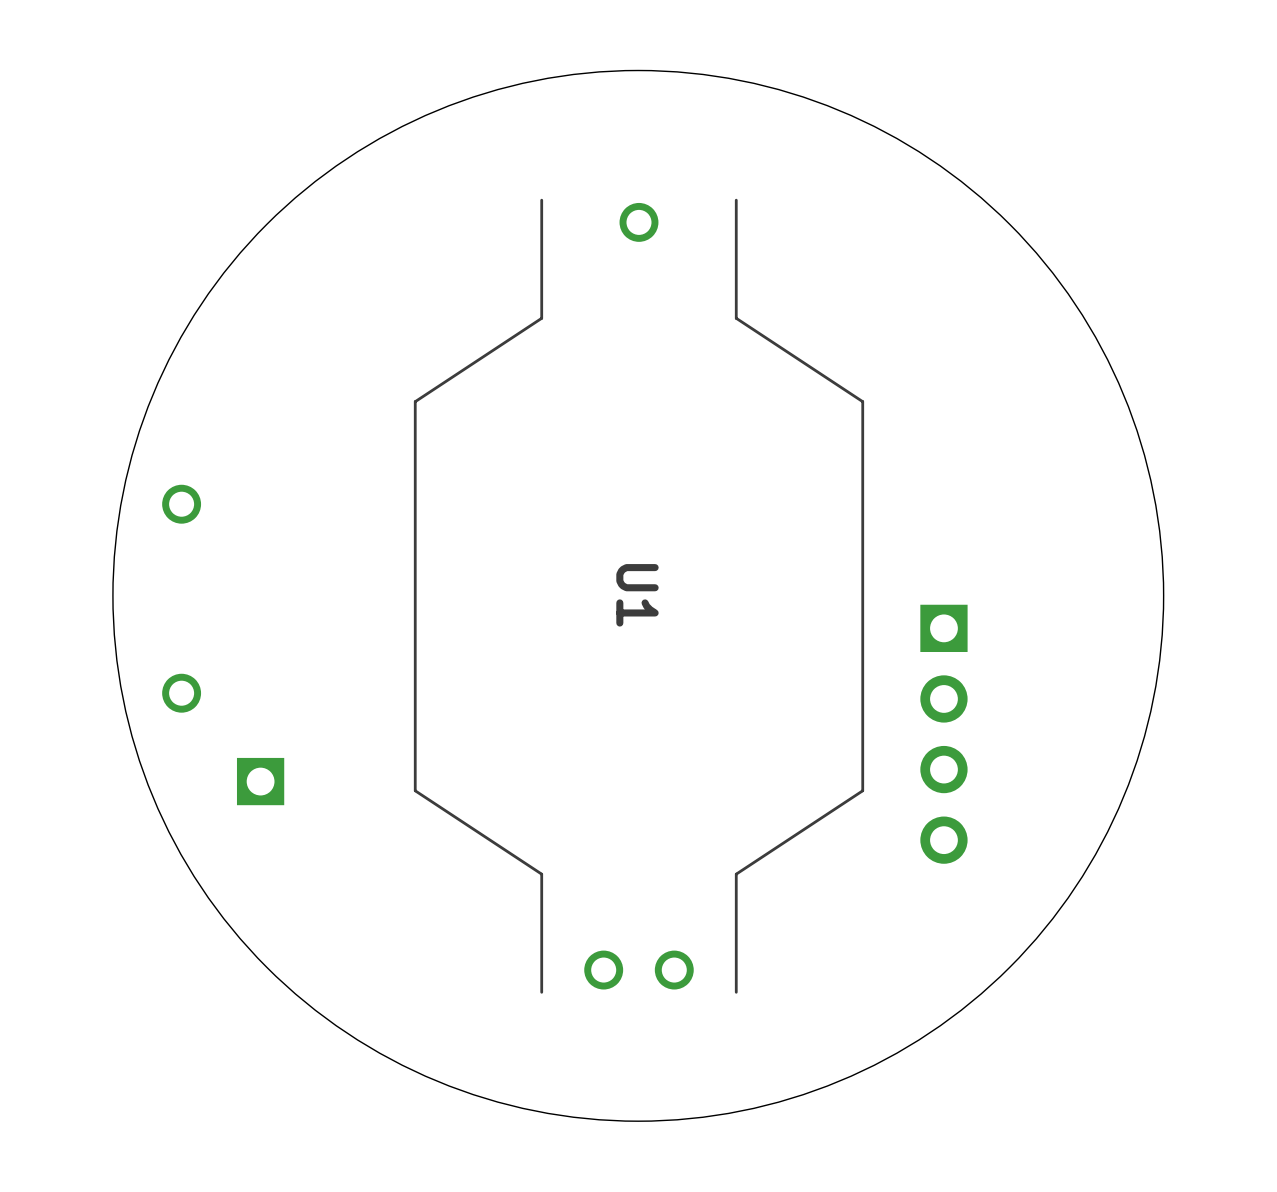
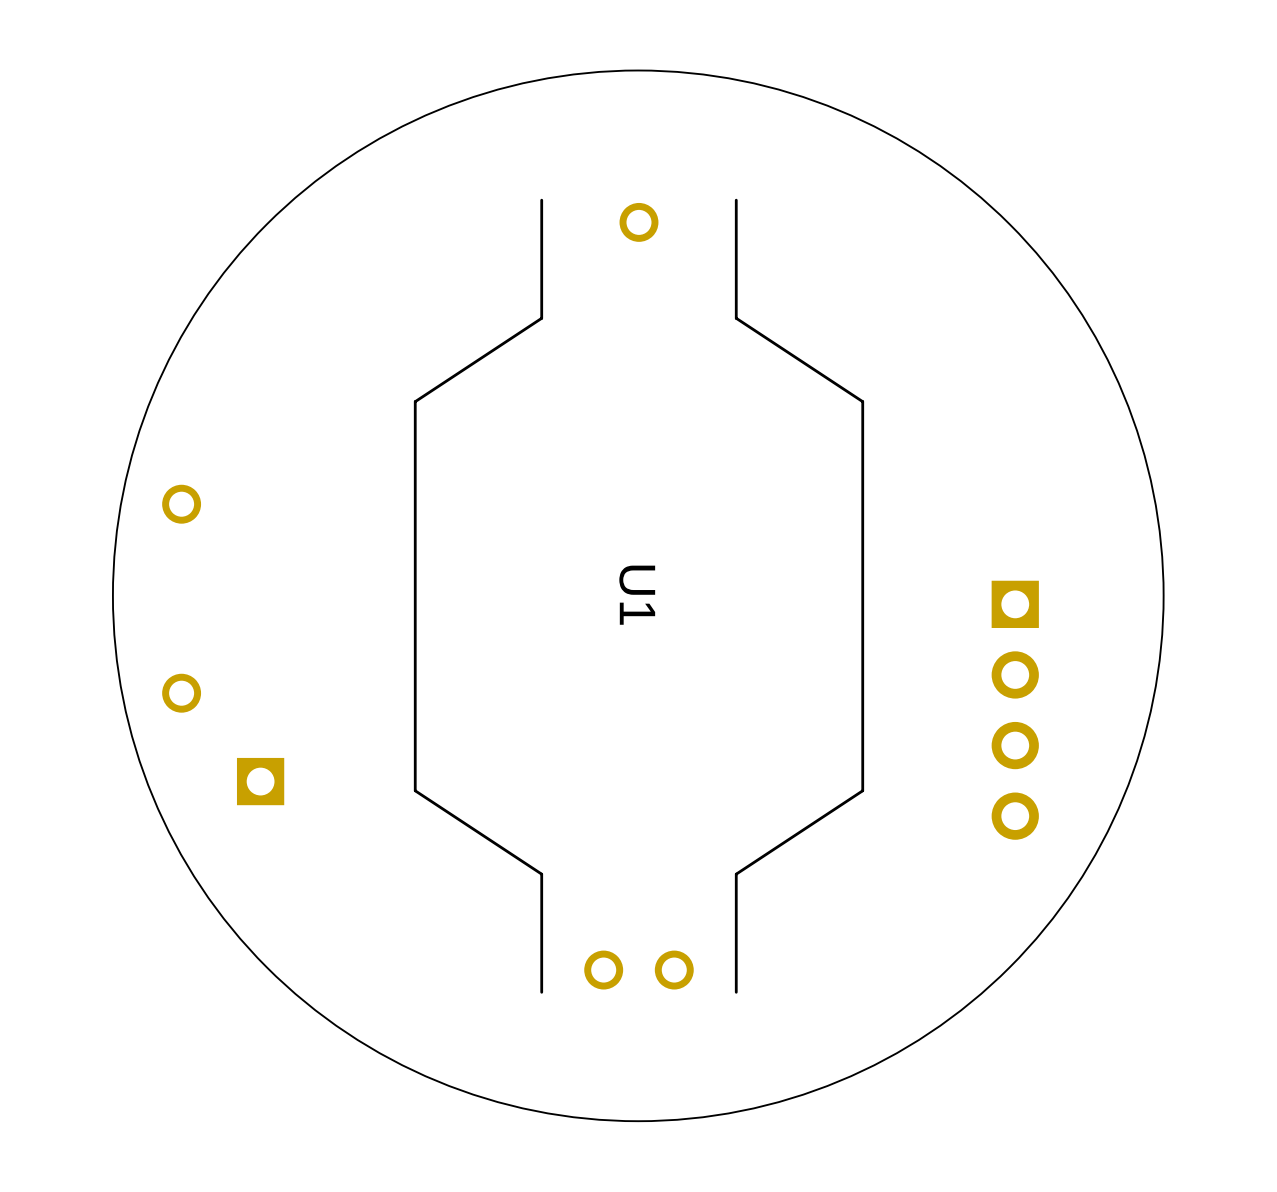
part position: (943, 734) -> (1015, 710)

